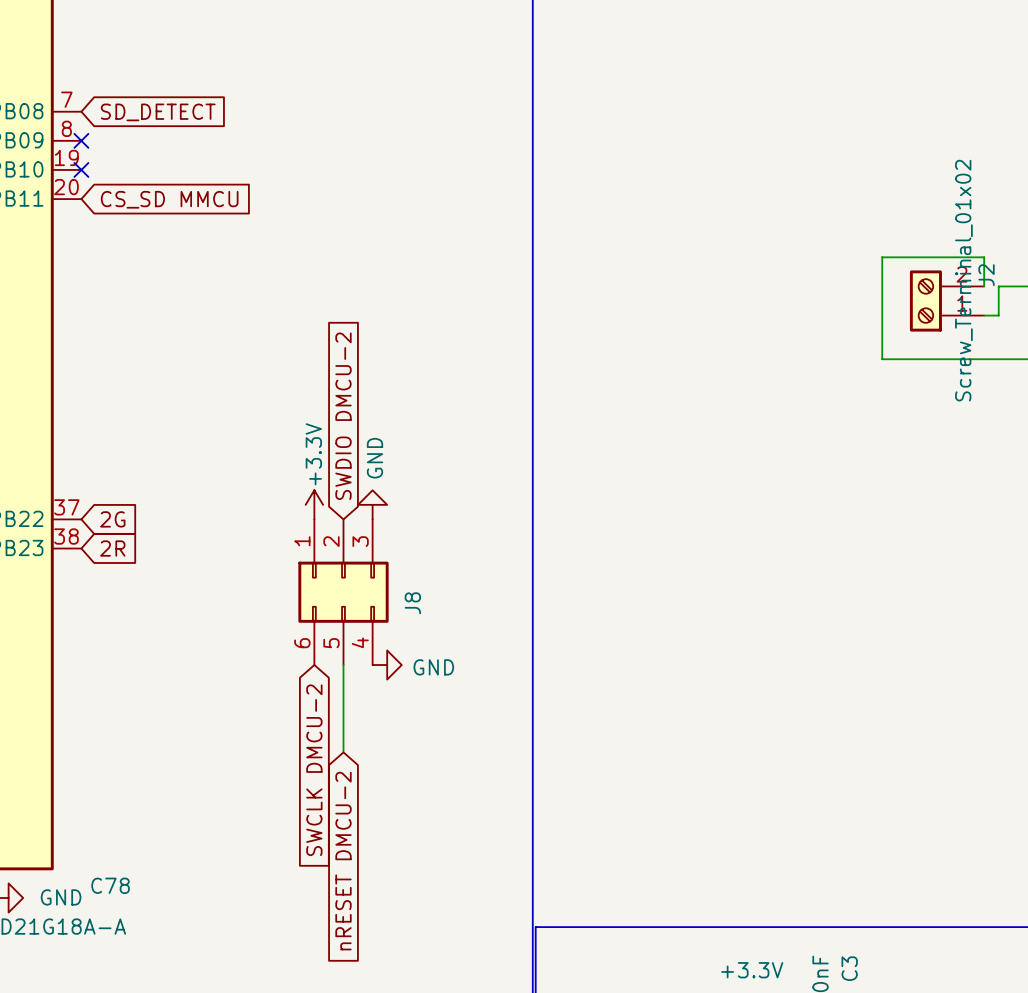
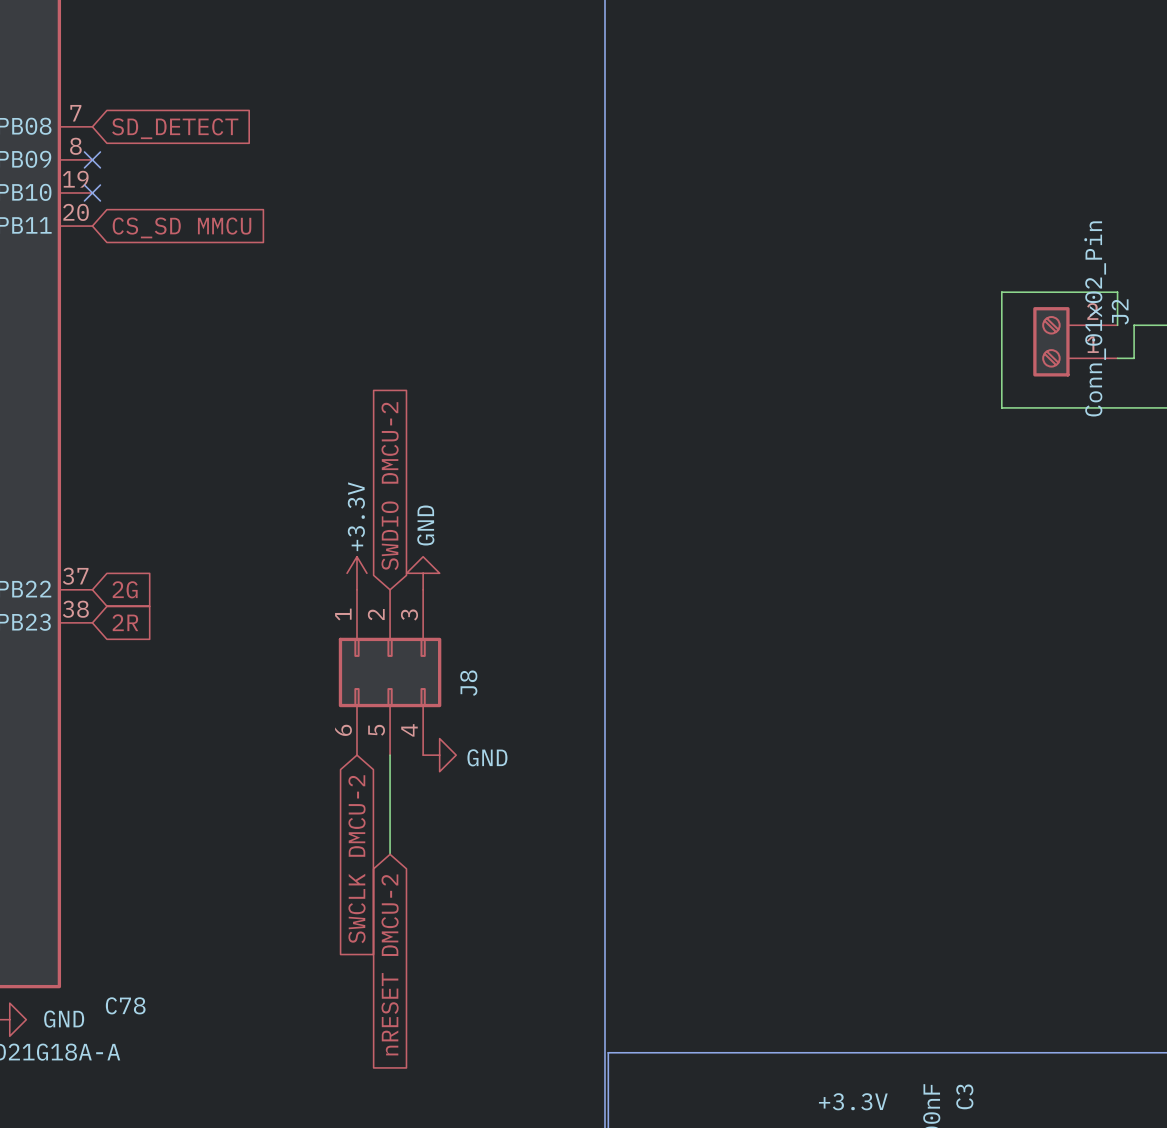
J2 value: Screw_Terminal_01x02 (963, 280) -> Conn_01x02_Pin (1095, 318)

